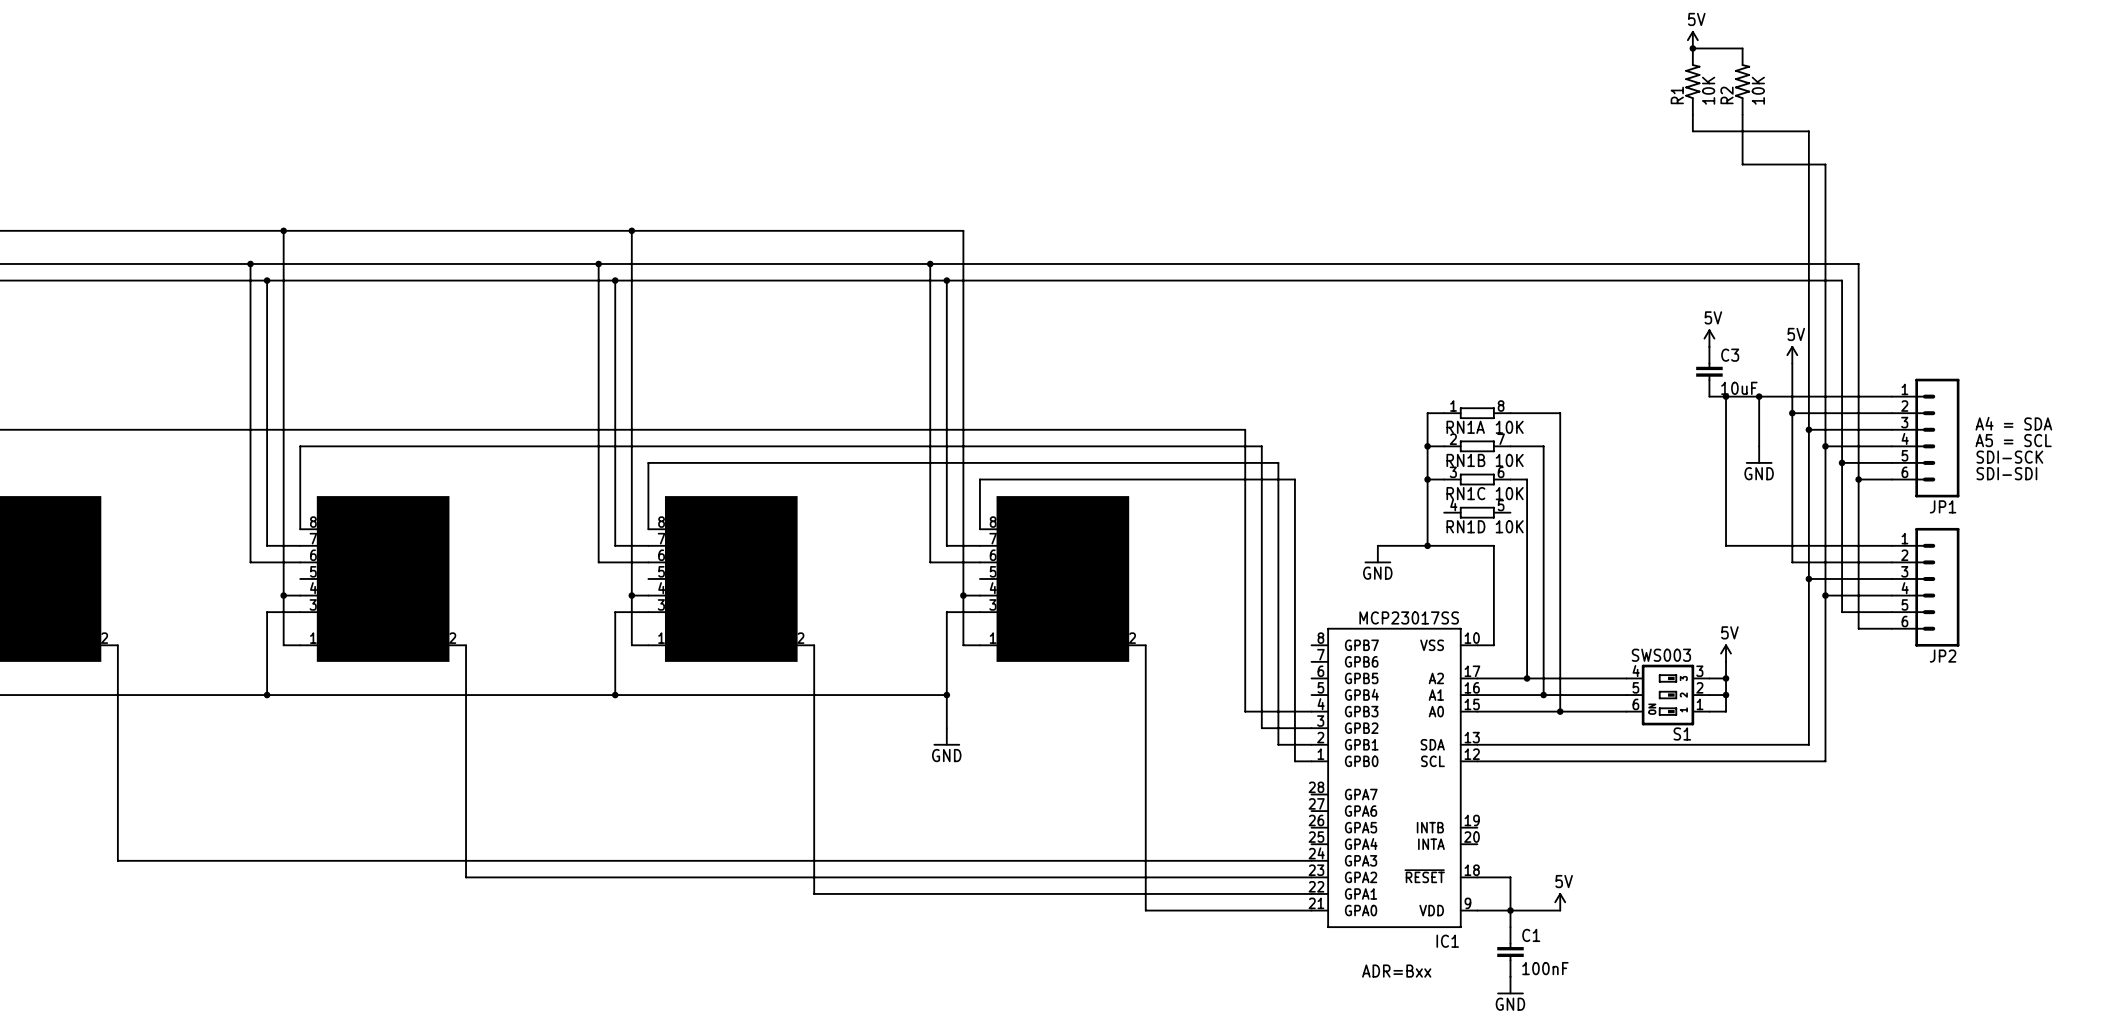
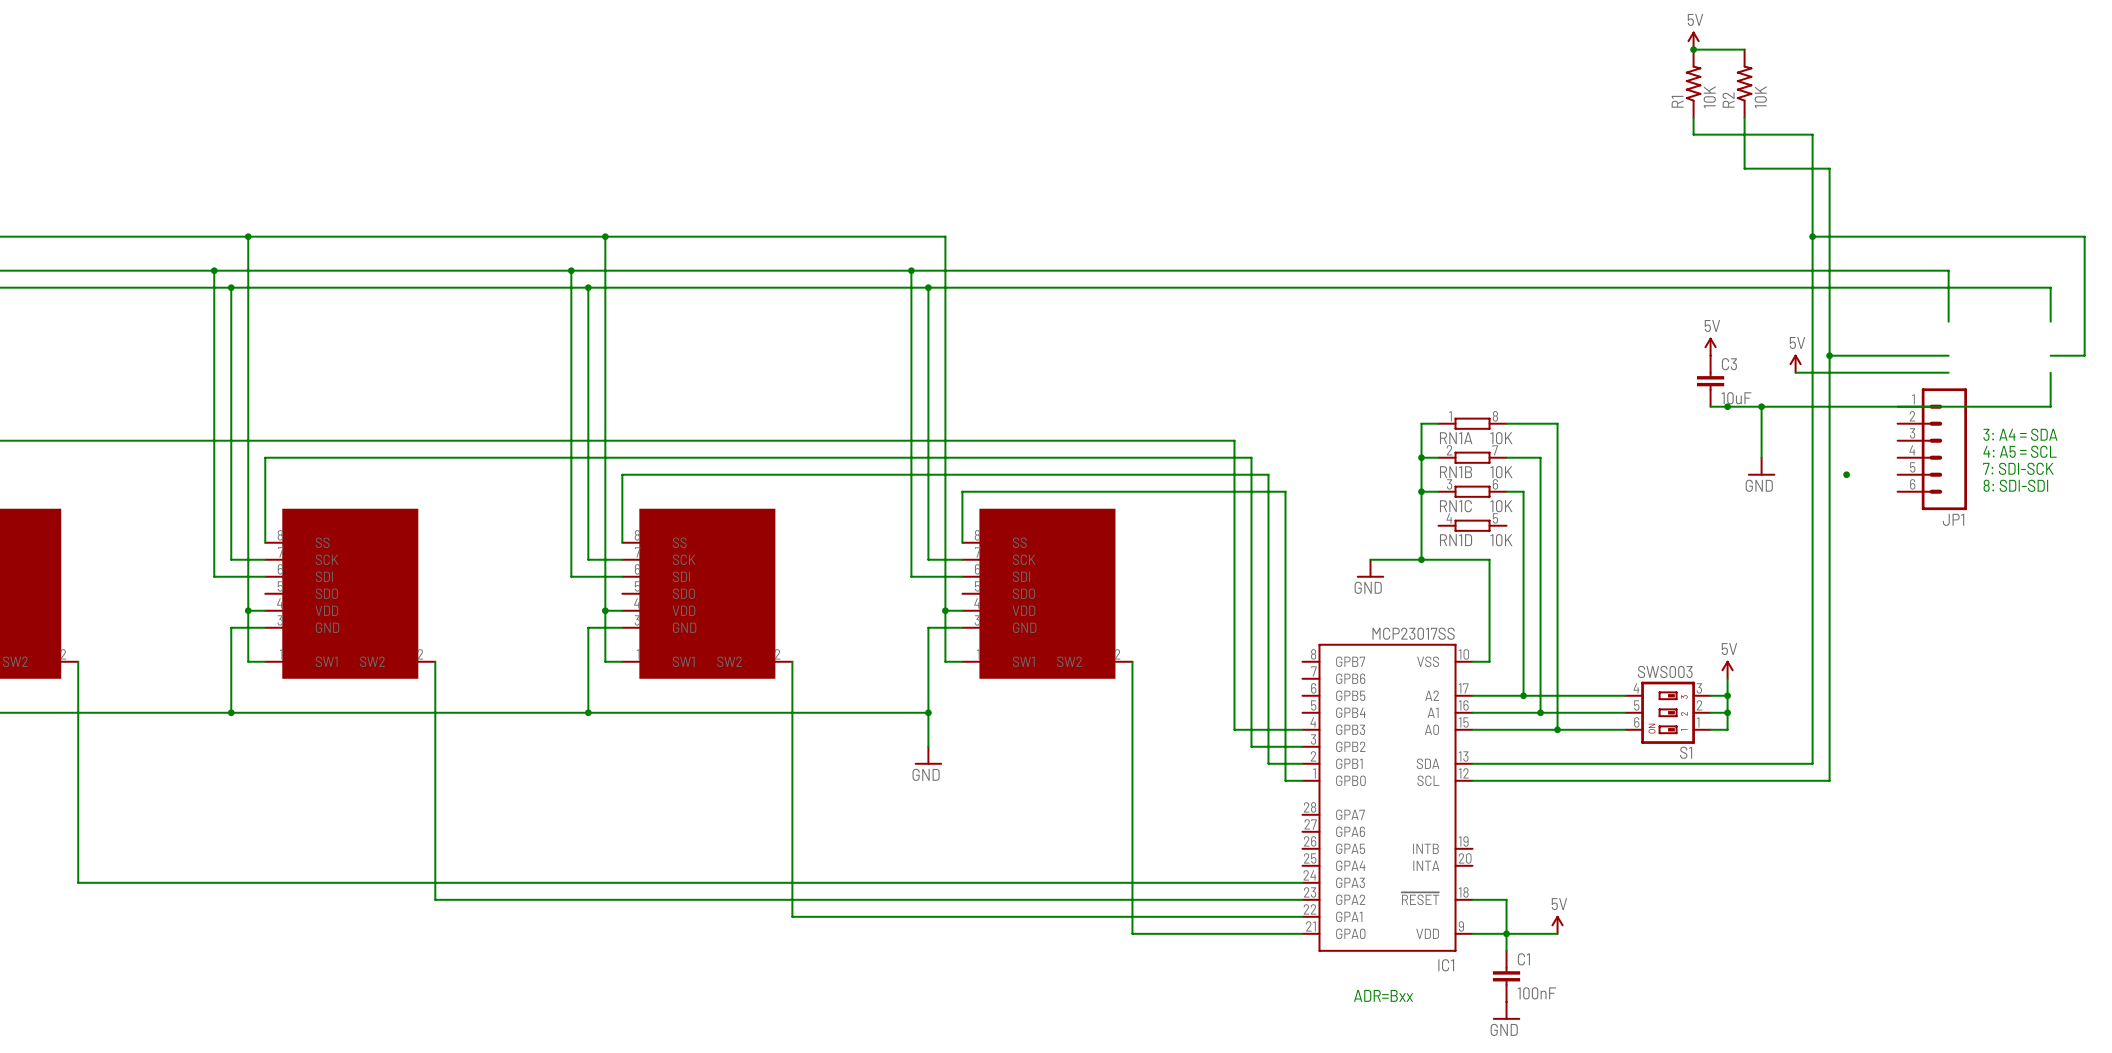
wire: none -> (1812, 236) (2084, 236) (2084, 355) (2050, 355)
junction: none -> (1812, 236)
wire: (1858, 263) (1858, 628) (1891, 628) -> (1863, 270) (1948, 270) (1948, 321)
wire: (1842, 280) (1842, 612) (1891, 612) -> (1846, 287) (2050, 287) (2050, 321)
wire: none -> (1829, 355) (1948, 355)
junction: none -> (1829, 355)
wire: (1792, 363) (1792, 562) (1891, 562) -> (1795, 372) (1948, 372)
wire: none -> (2050, 372) (2050, 406) (1897, 406)
wire: (1726, 396) (1726, 545) (1891, 545) -> none
wire: (1792, 413) (1891, 413) -> none
junction: (1792, 413) -> none
text: A4 = SDA (2013, 423) -> 3: A4 = SDA (2020, 434)
wire: (1808, 429) (1891, 429) -> none
junction: (1808, 429) -> none
text: A5 = SCL (2013, 440) -> 4: A5 = SCL (2020, 451)
wire: (1825, 446) (1891, 446) -> none
junction: (1825, 446) -> none
text: SDI-SCK (2009, 457) -> 7: SDI-SCK (2018, 468)
wire: (1842, 462) (1891, 462) -> none
text: SDI-SDI (2006, 473) -> 8: SDI-SDI (2015, 485)
wire: (1858, 479) (1891, 479) -> none
junction: (1858, 479) -> none
wire: (1808, 578) (1891, 578) -> none
junction: (1808, 578) -> none
JP2: (1925, 587) -> none
wire: (1825, 595) (1891, 595) -> none
junction: (1825, 595) -> none

